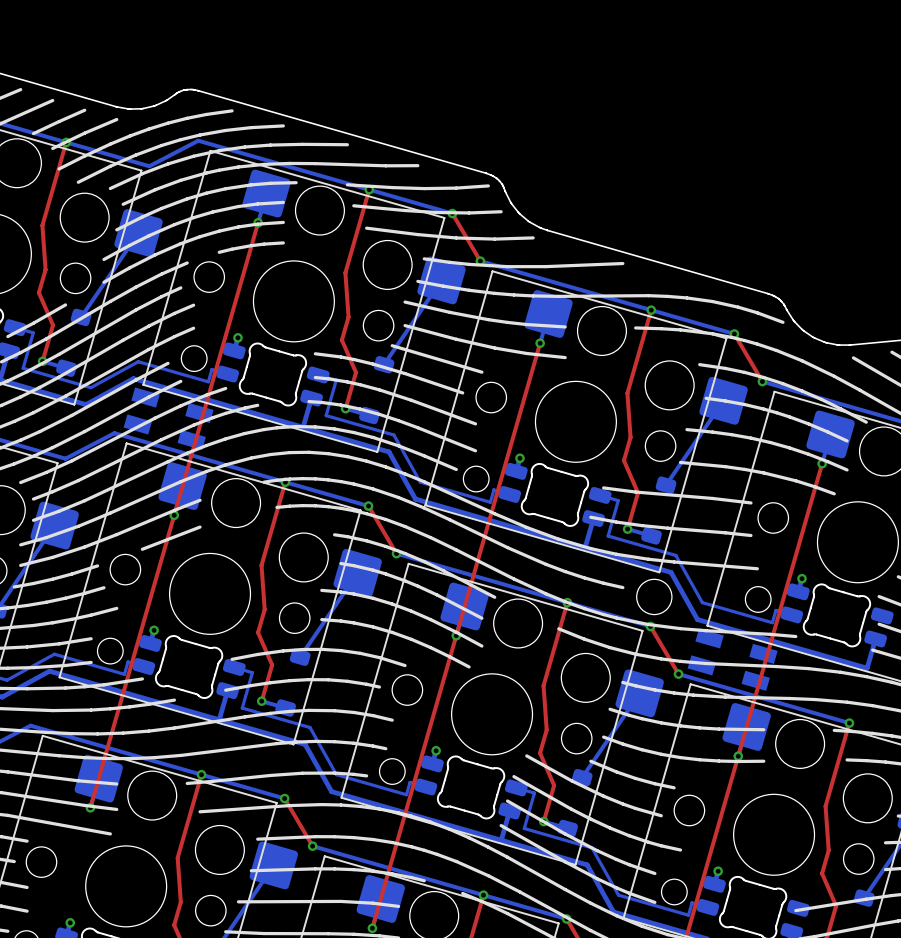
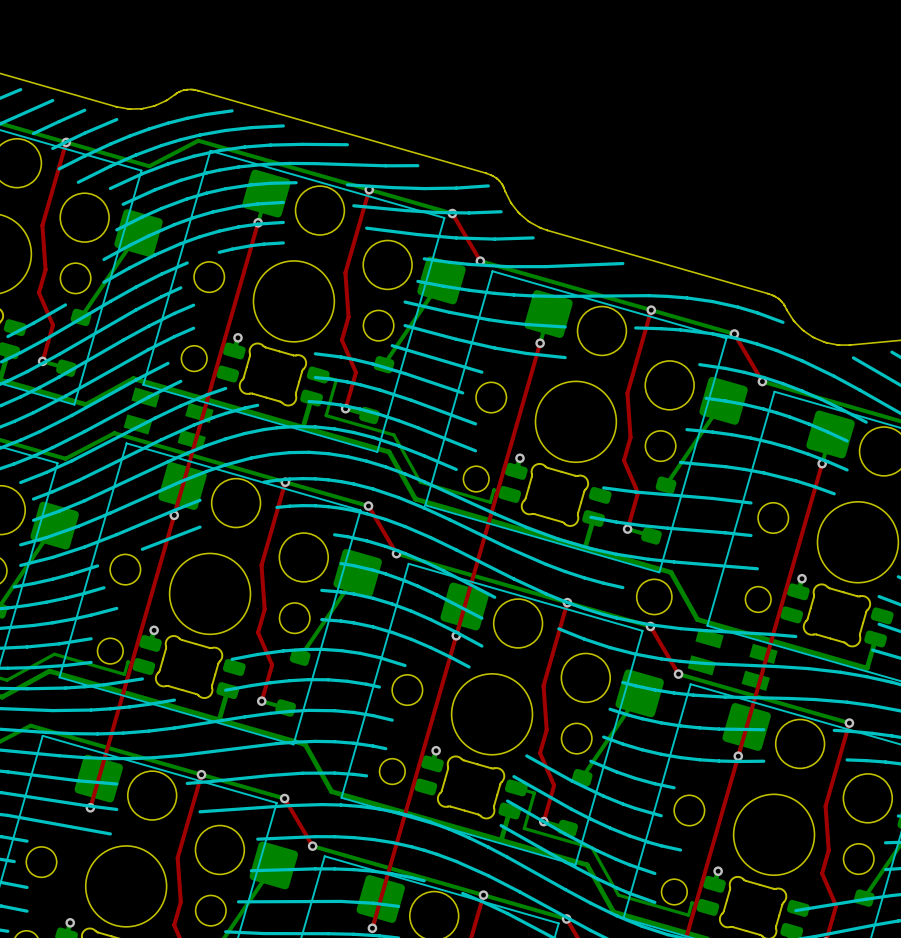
bottom track: (15, 327) (33, 332) (23, 368) (90, 387) (138, 361) (208, 381) (211, 369) (227, 374) -> none
bottom track: (600, 495) (618, 500) (608, 536) (675, 555) (702, 602) (772, 622) (775, 610) (791, 614) -> none
bottom track: (234, 667) (252, 672) (242, 708) (310, 727) (336, 774) (406, 794) (410, 782) (425, 786) -> none

